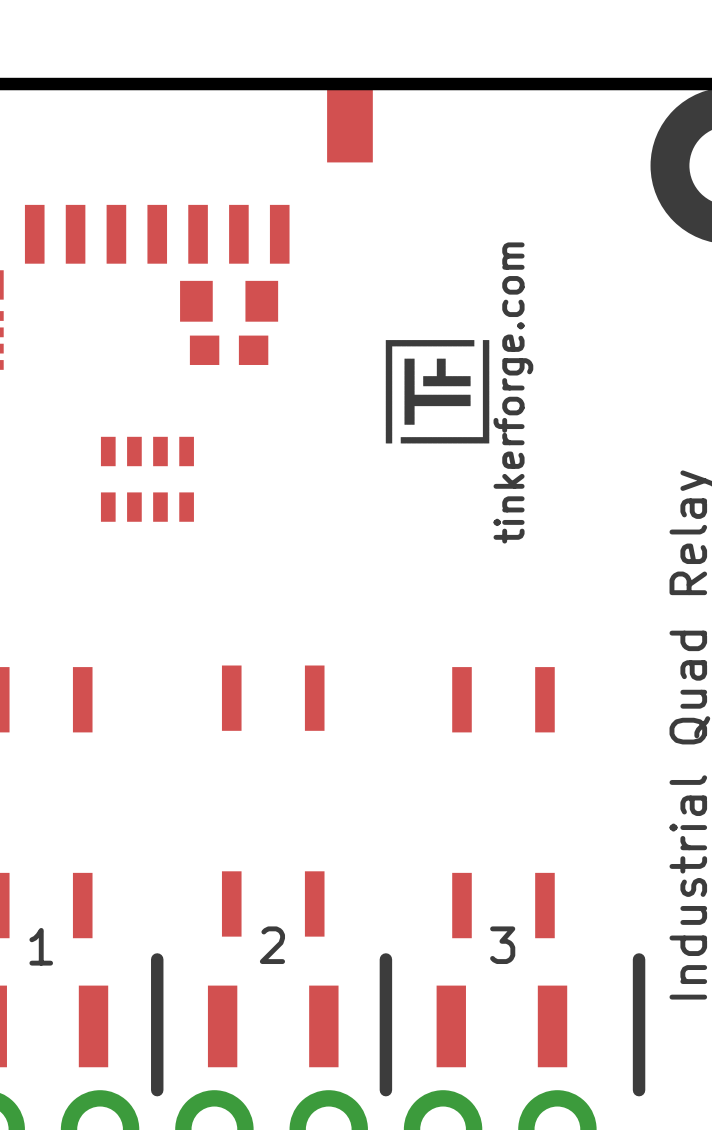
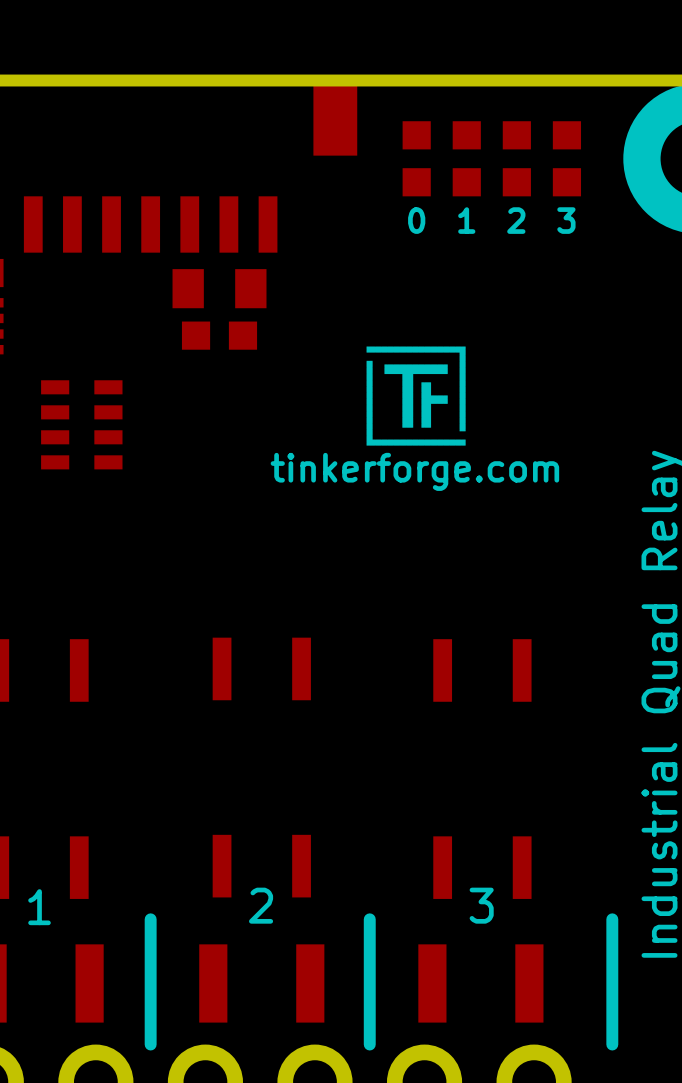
part: none -> (416, 158)
part: none -> (466, 158)
part: none -> (516, 158)
part: none -> (566, 158)
text: none -> 0 (416, 220)
text: none -> 1 (466, 220)
text: none -> 2 (516, 220)
text: none -> 3 (566, 220)
drawing shape: [385, 340, 490, 444] -> [366, 346, 466, 446]
text rotation: 0° (513, 392) -> 90° clockwise (414, 471)
part rotation: 0° (147, 479) -> 90° clockwise (81, 424)
part position: (147, 479) -> (81, 424)

